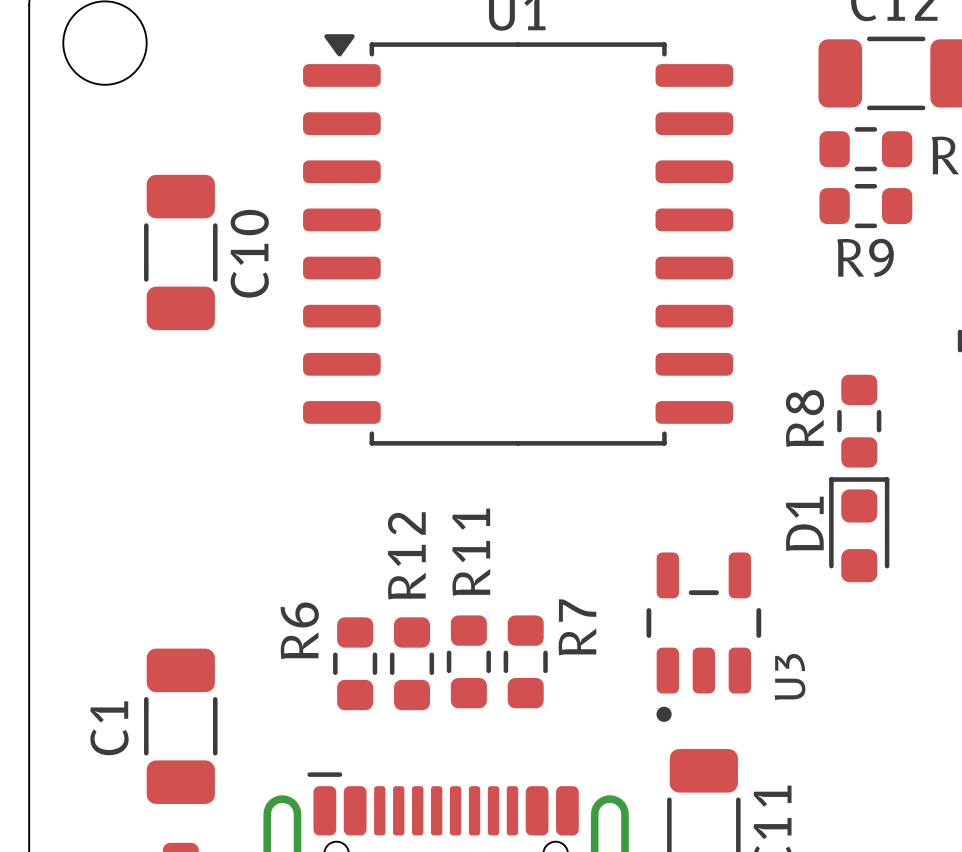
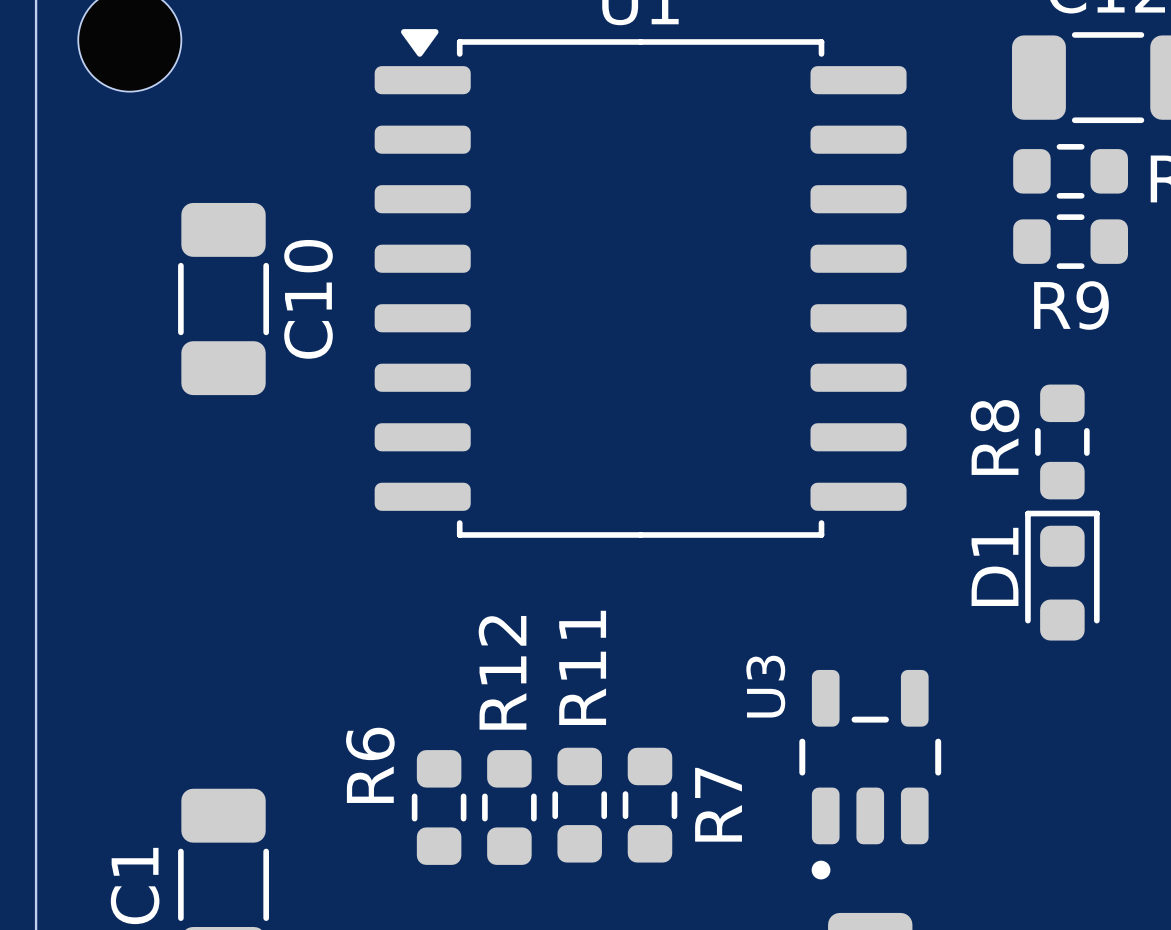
R8 position: (859, 421) -> (1062, 441)
D1 position: (859, 529) -> (1062, 575)
R7 name position: R7 (577, 627) -> R7 (718, 804)
U3 name position: U3 (790, 676) -> U3 (765, 686)

